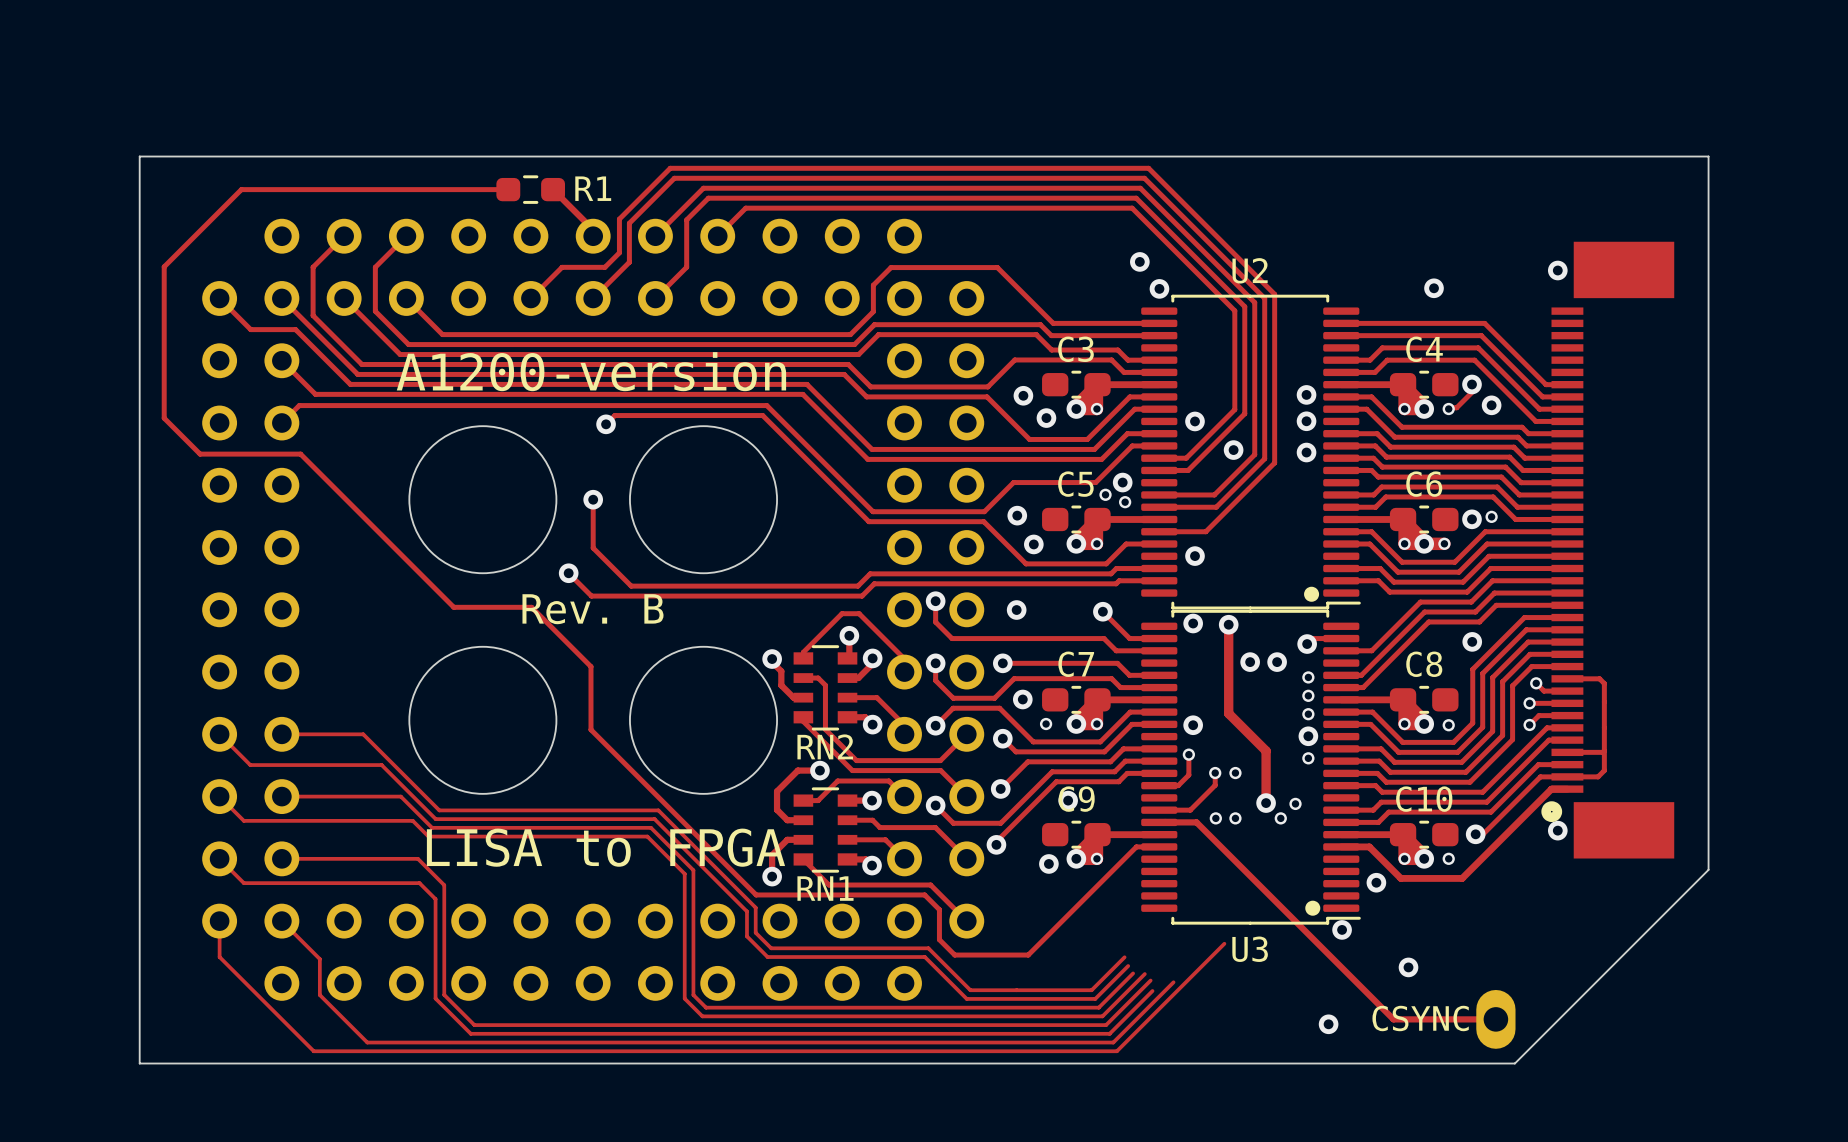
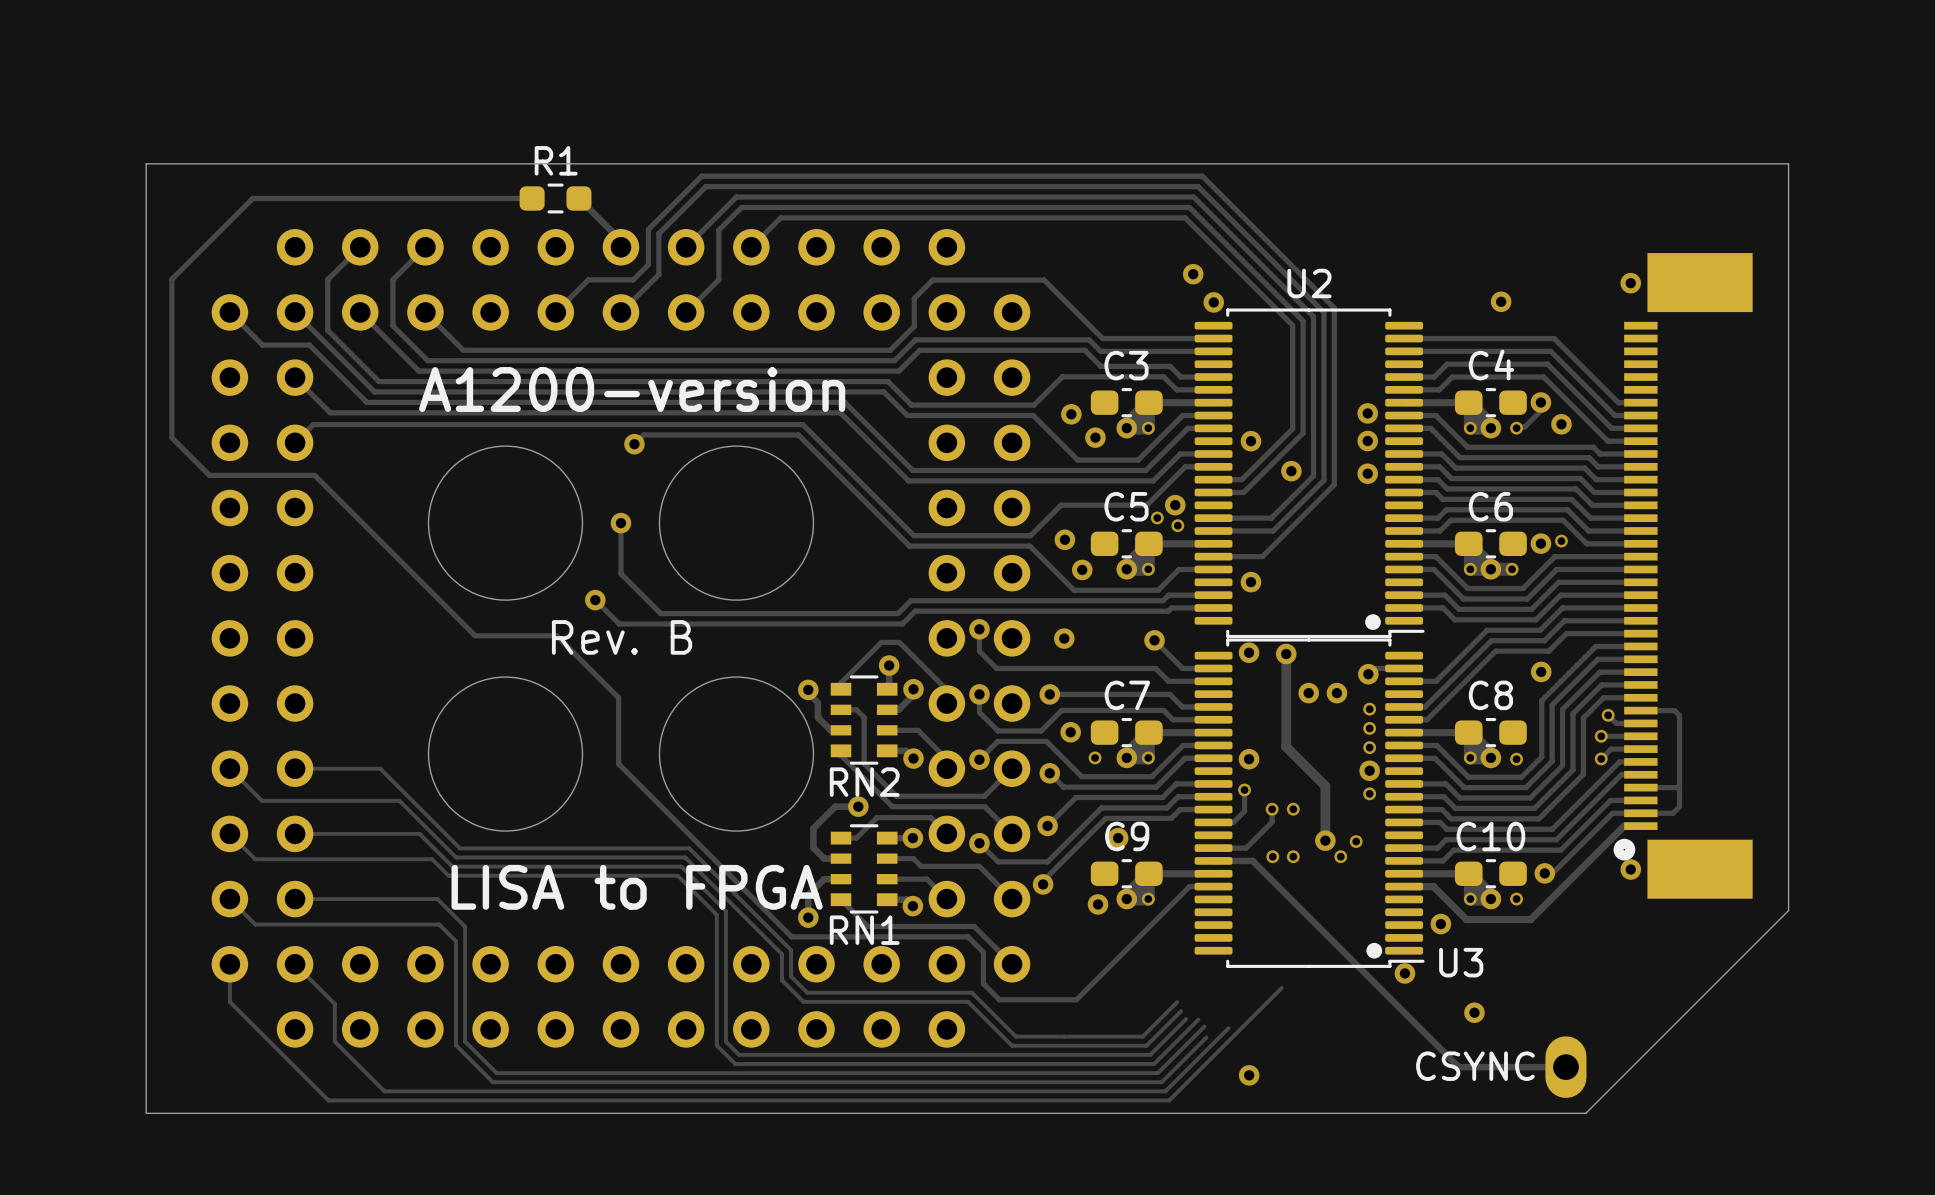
R1 name position: R1 (593, 188) -> R1 (556, 160)
U3 name position: U3 (1250, 949) -> U3 (1461, 962)
via position: (1328, 1024) -> (1249, 1075)

